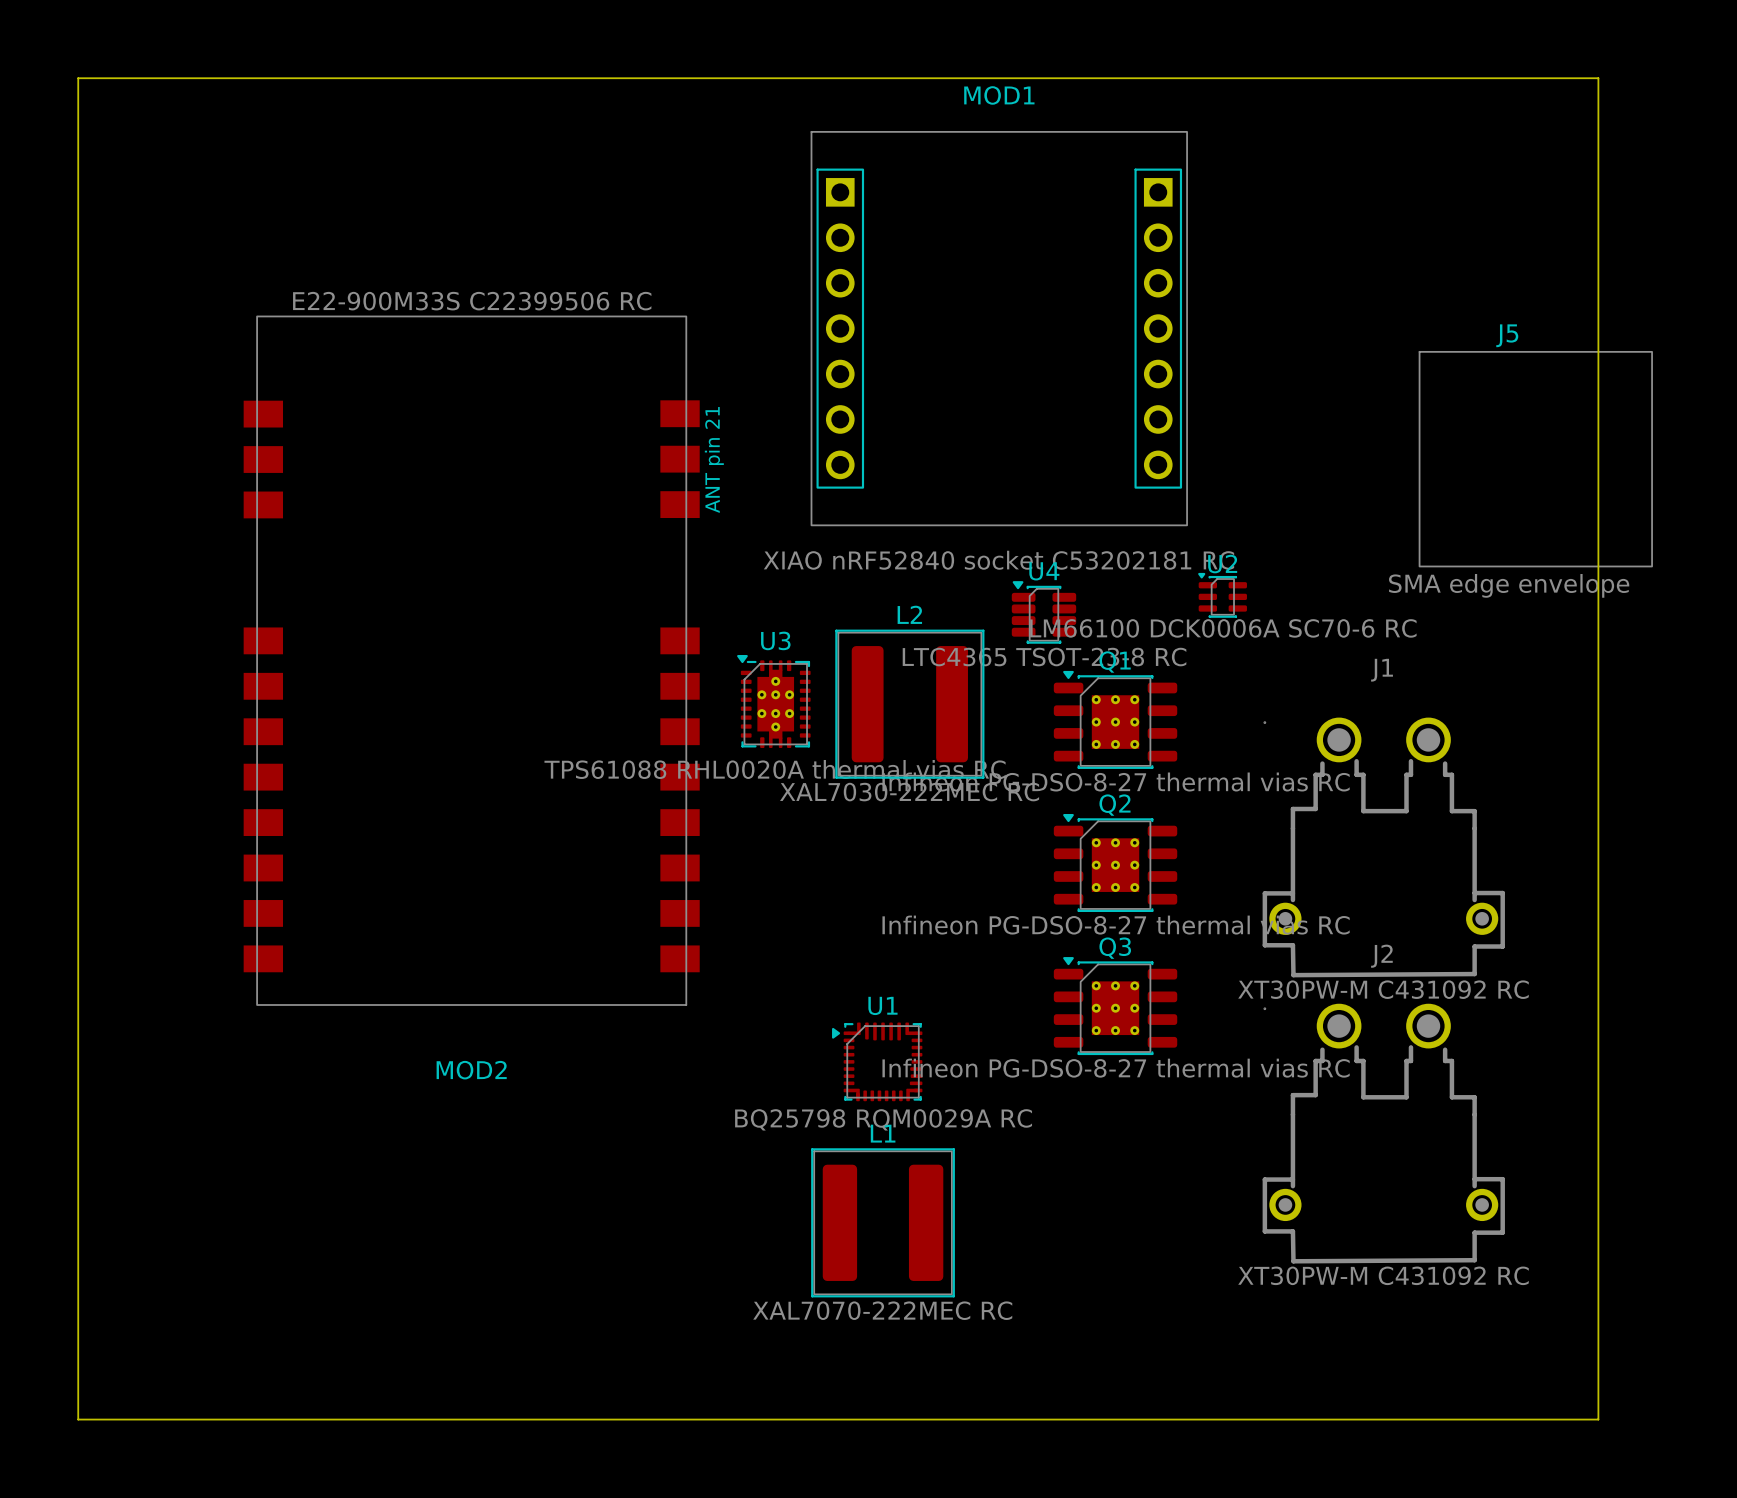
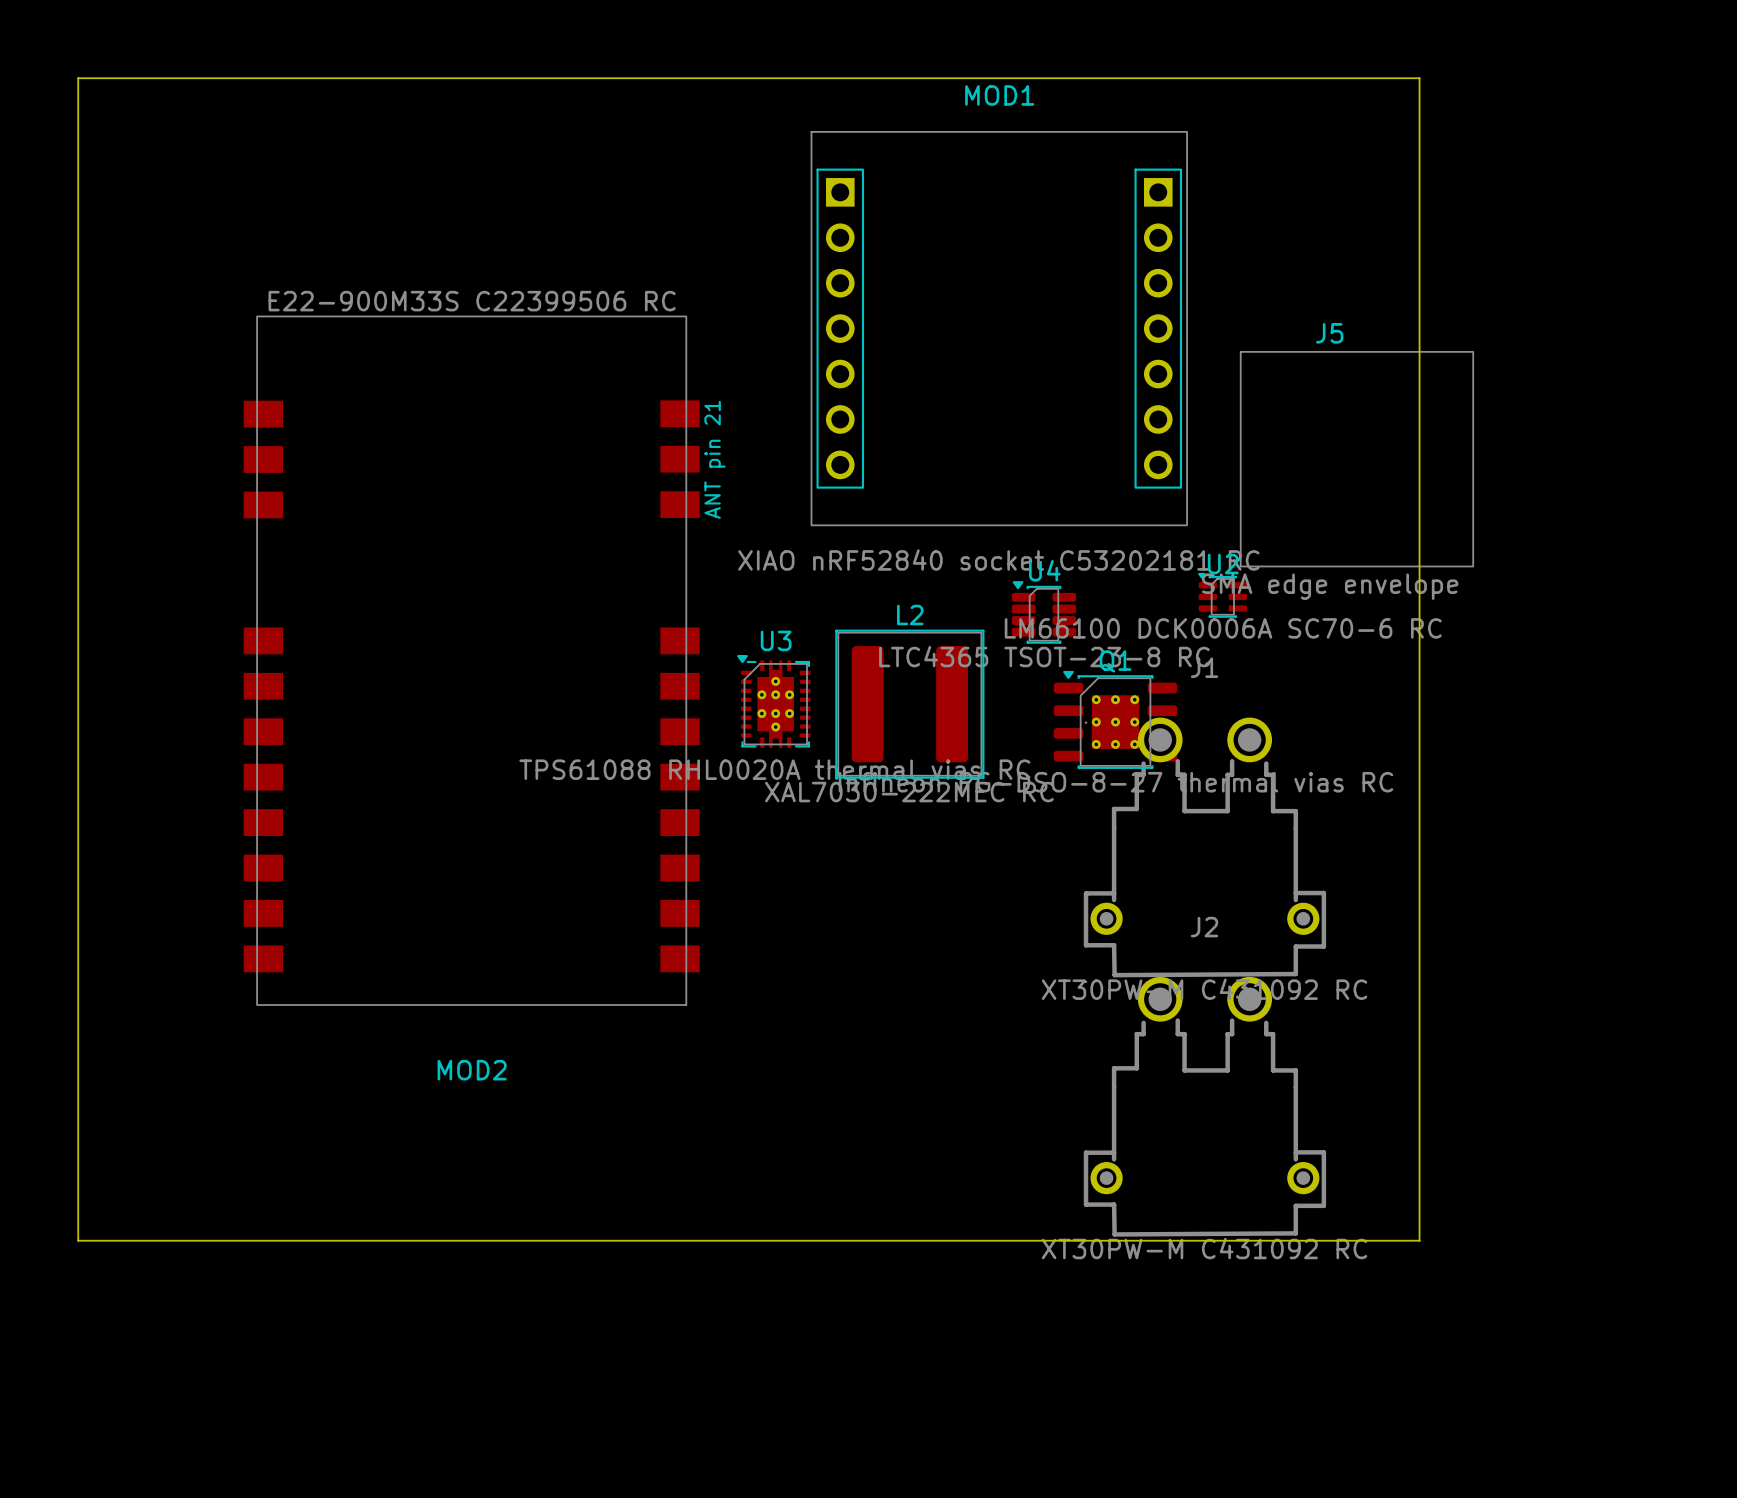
board edge: (1419, 78) (1598, 78) (1598, 1419) (78, 1419) (78, 1240) -> (1419, 78) (1419, 1240) (78, 1240)
J5 position: (1535, 459) -> (1356, 459)
J1 position: (1383, 847) -> (1204, 847)
Q2: Infineon PG-DSO-8-27 thermal vias RC (1115, 862) -> none
Q3: Infineon PG-DSO-8-27 thermal vias RC (1115, 1006) -> none
U1: BQ25798 RQM0029A RC (877, 1061) -> none
J2 position: (1383, 1133) -> (1204, 1106)
L1: XAL7070-222MEC RC (883, 1222) -> none

